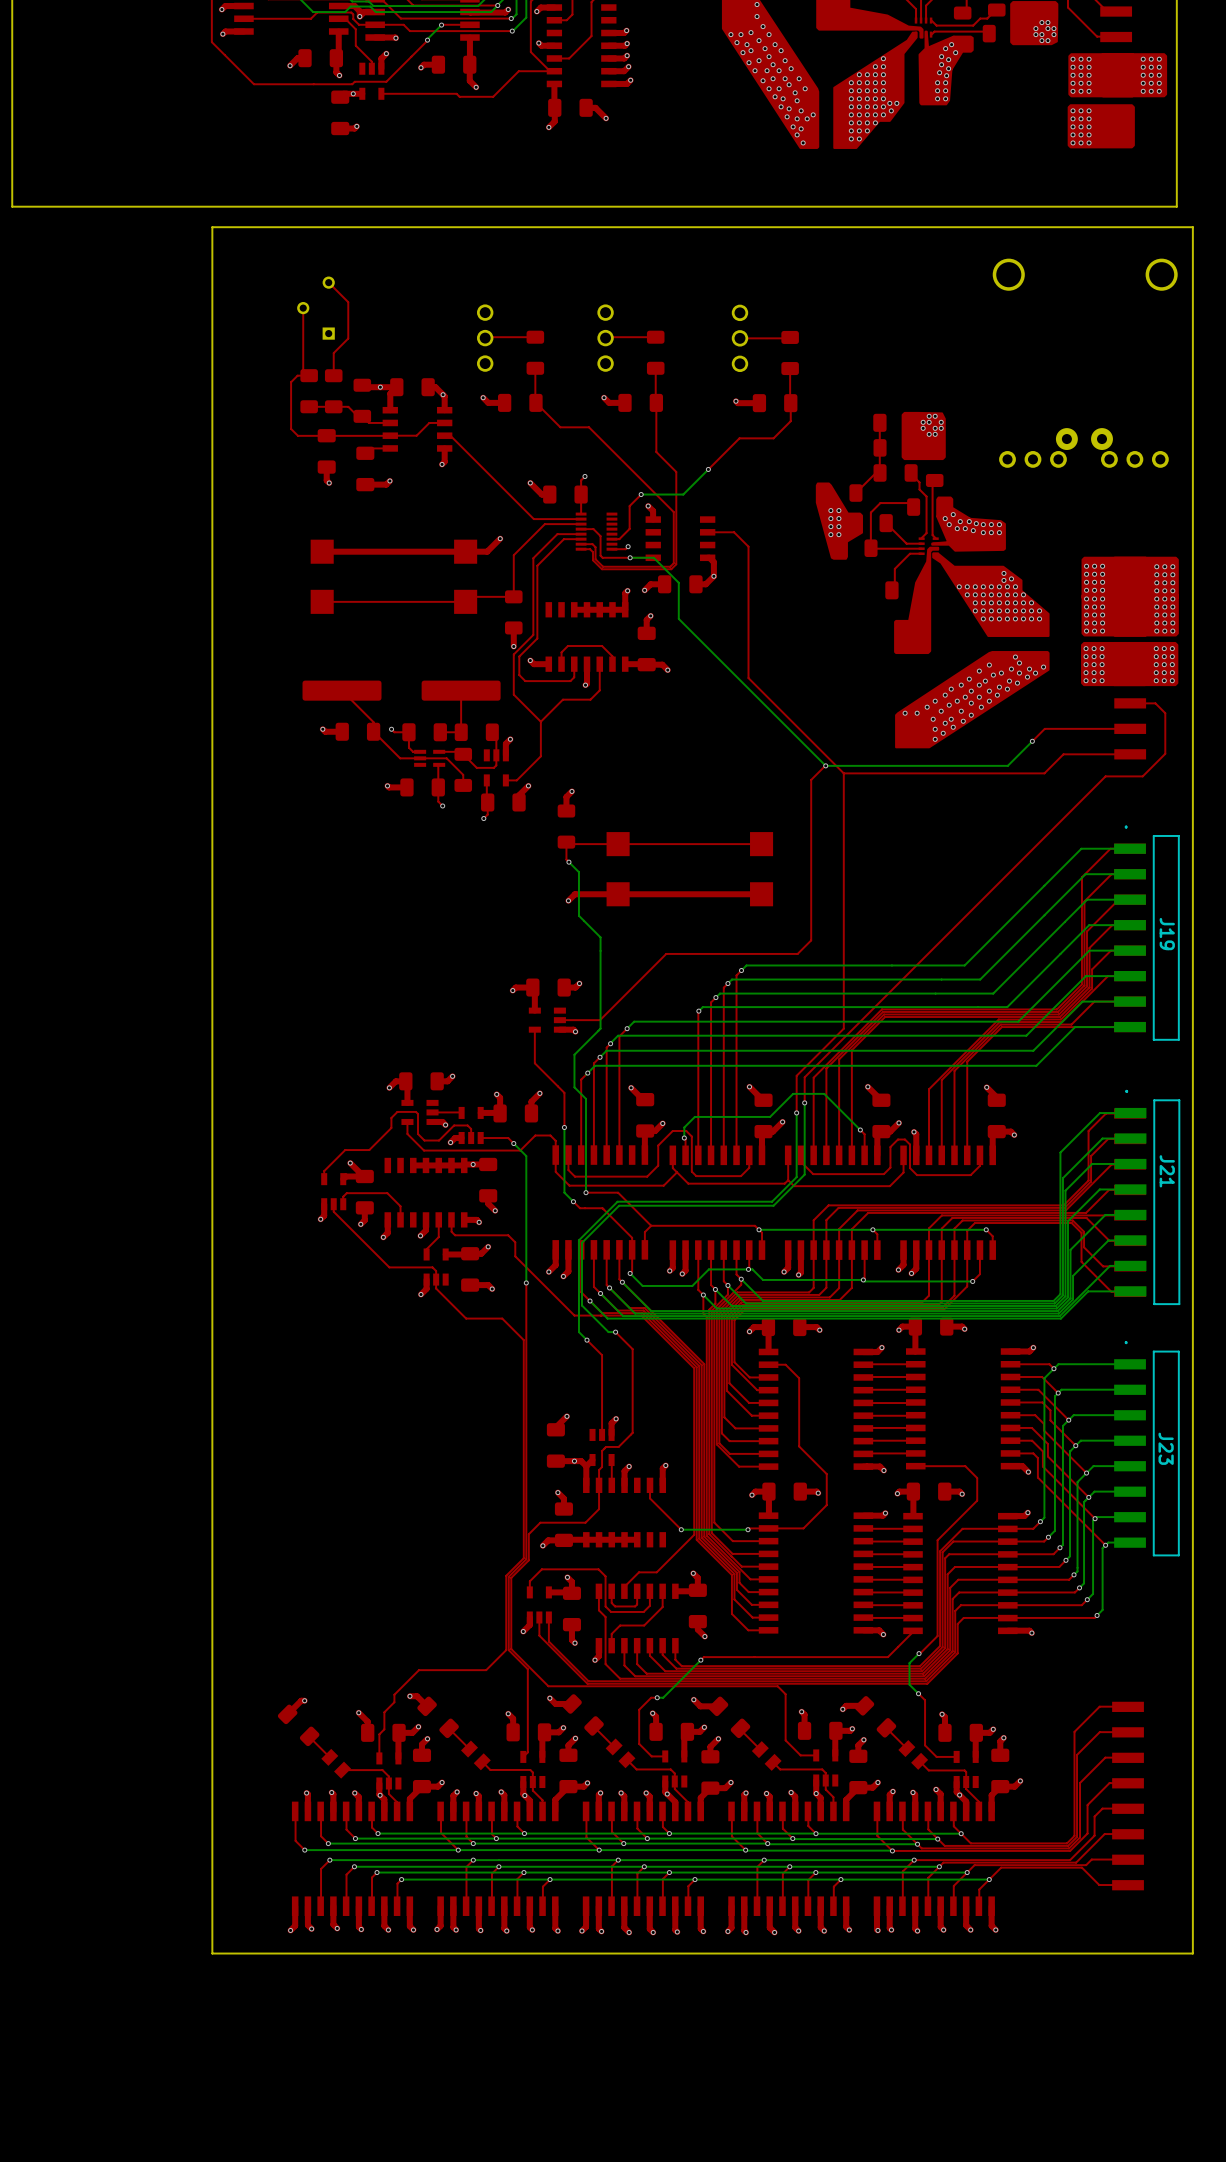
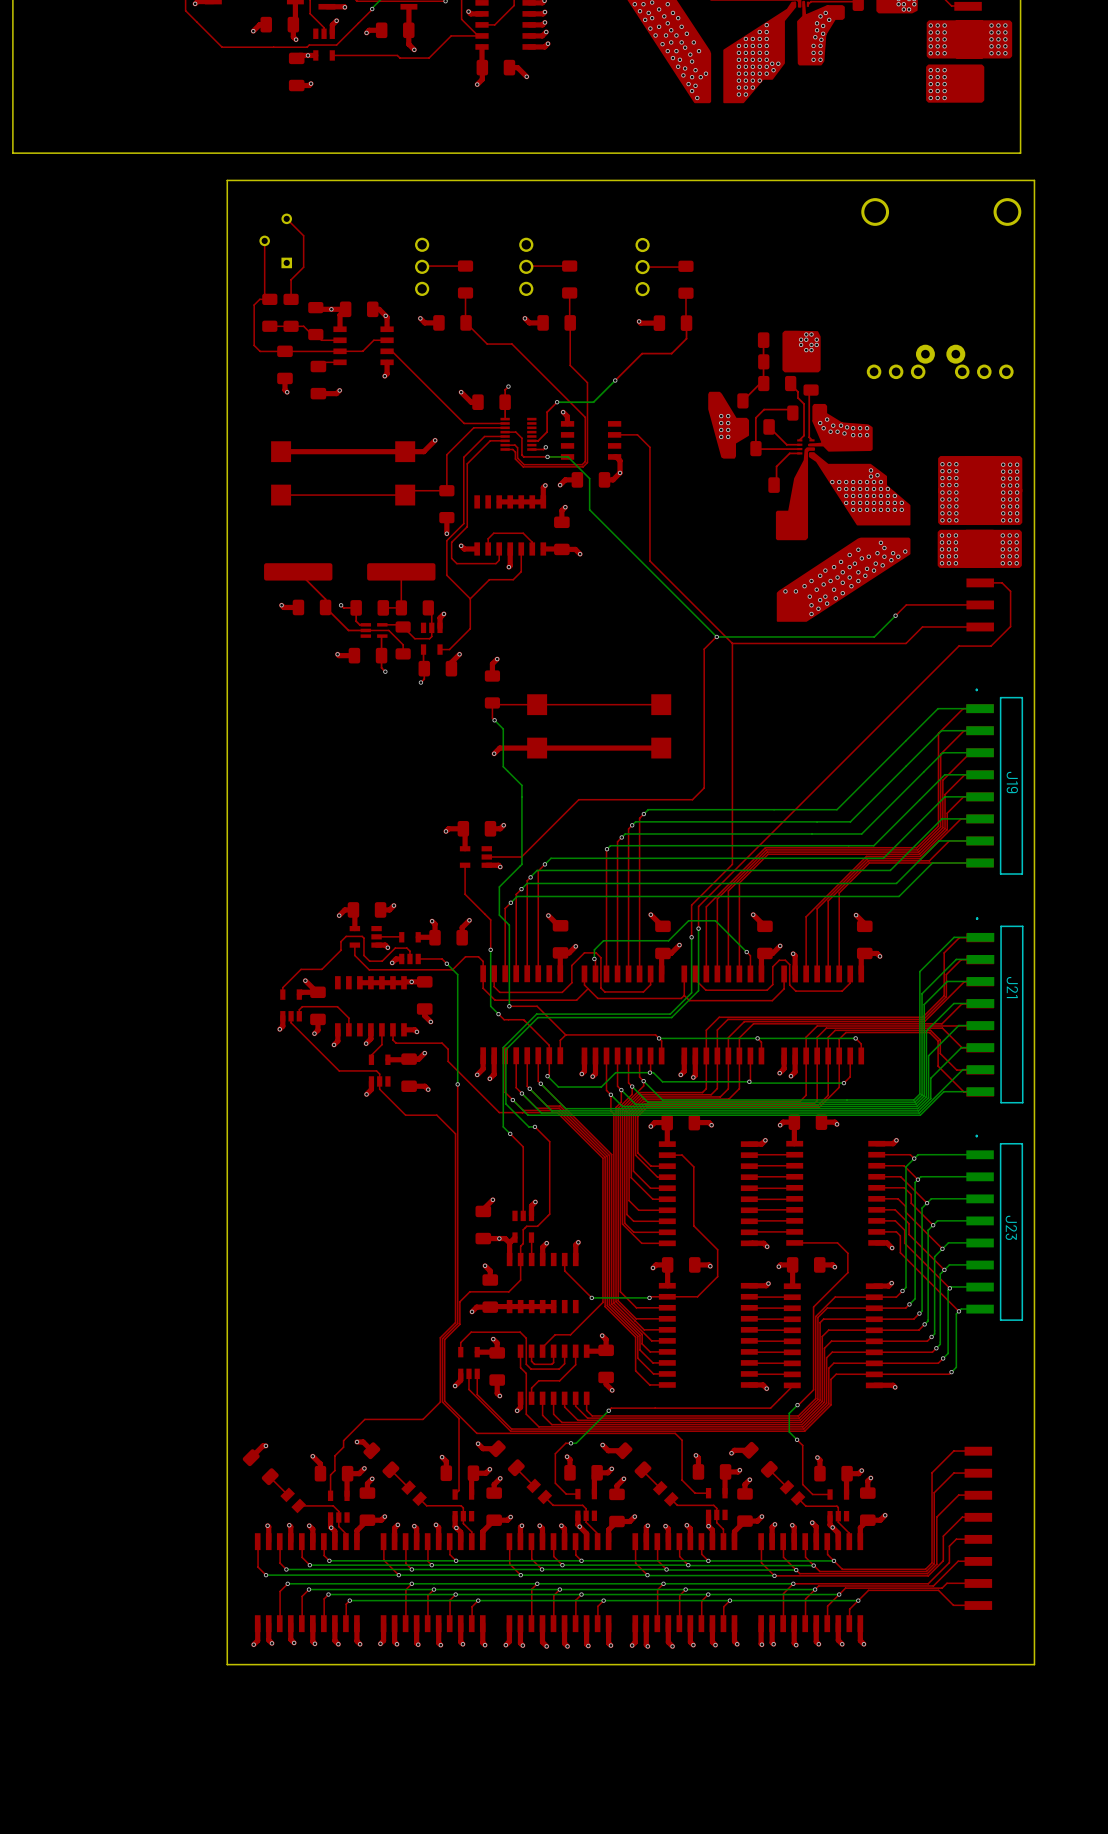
board edge: (1192, 238) (1192, 227) (212, 227) (212, 1953) (260, 1953) -> (1034, 180) (227, 180) (227, 1664)

